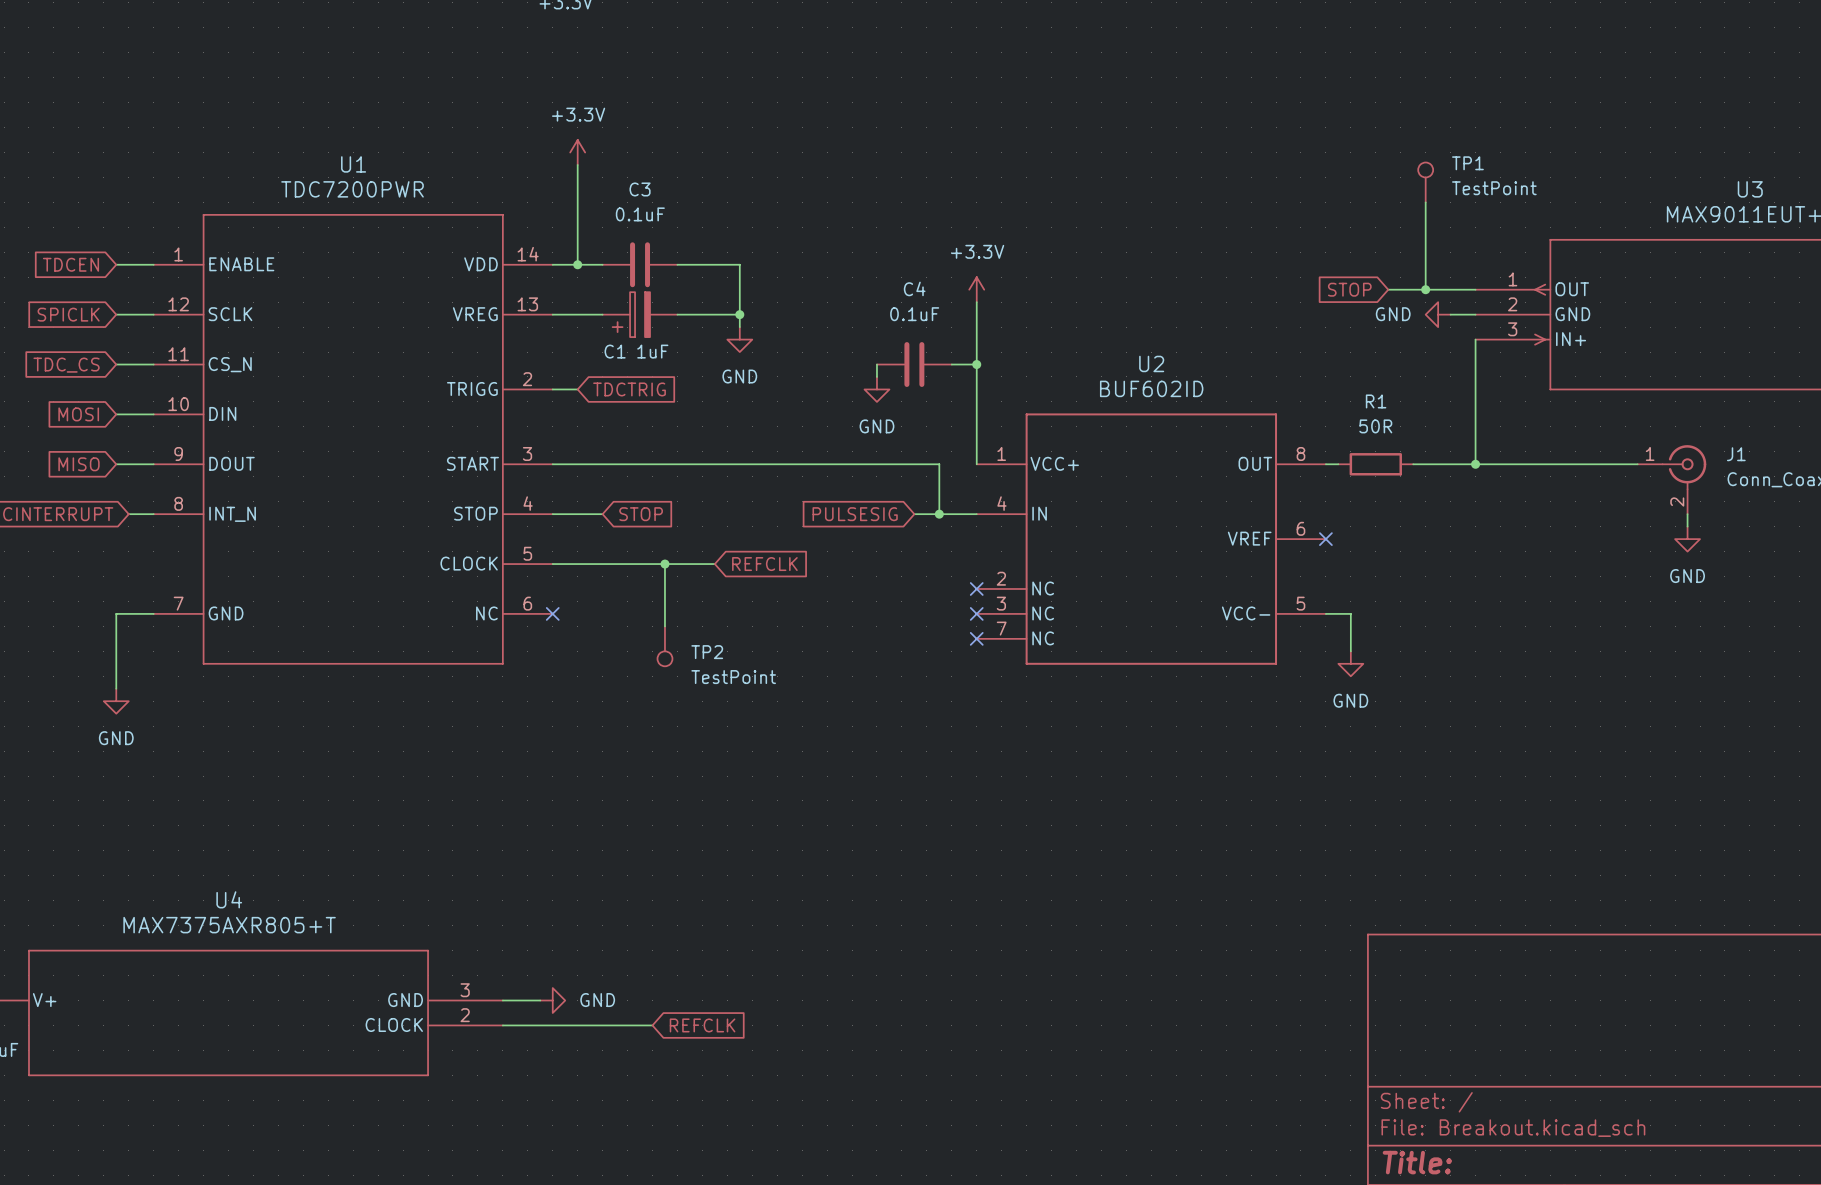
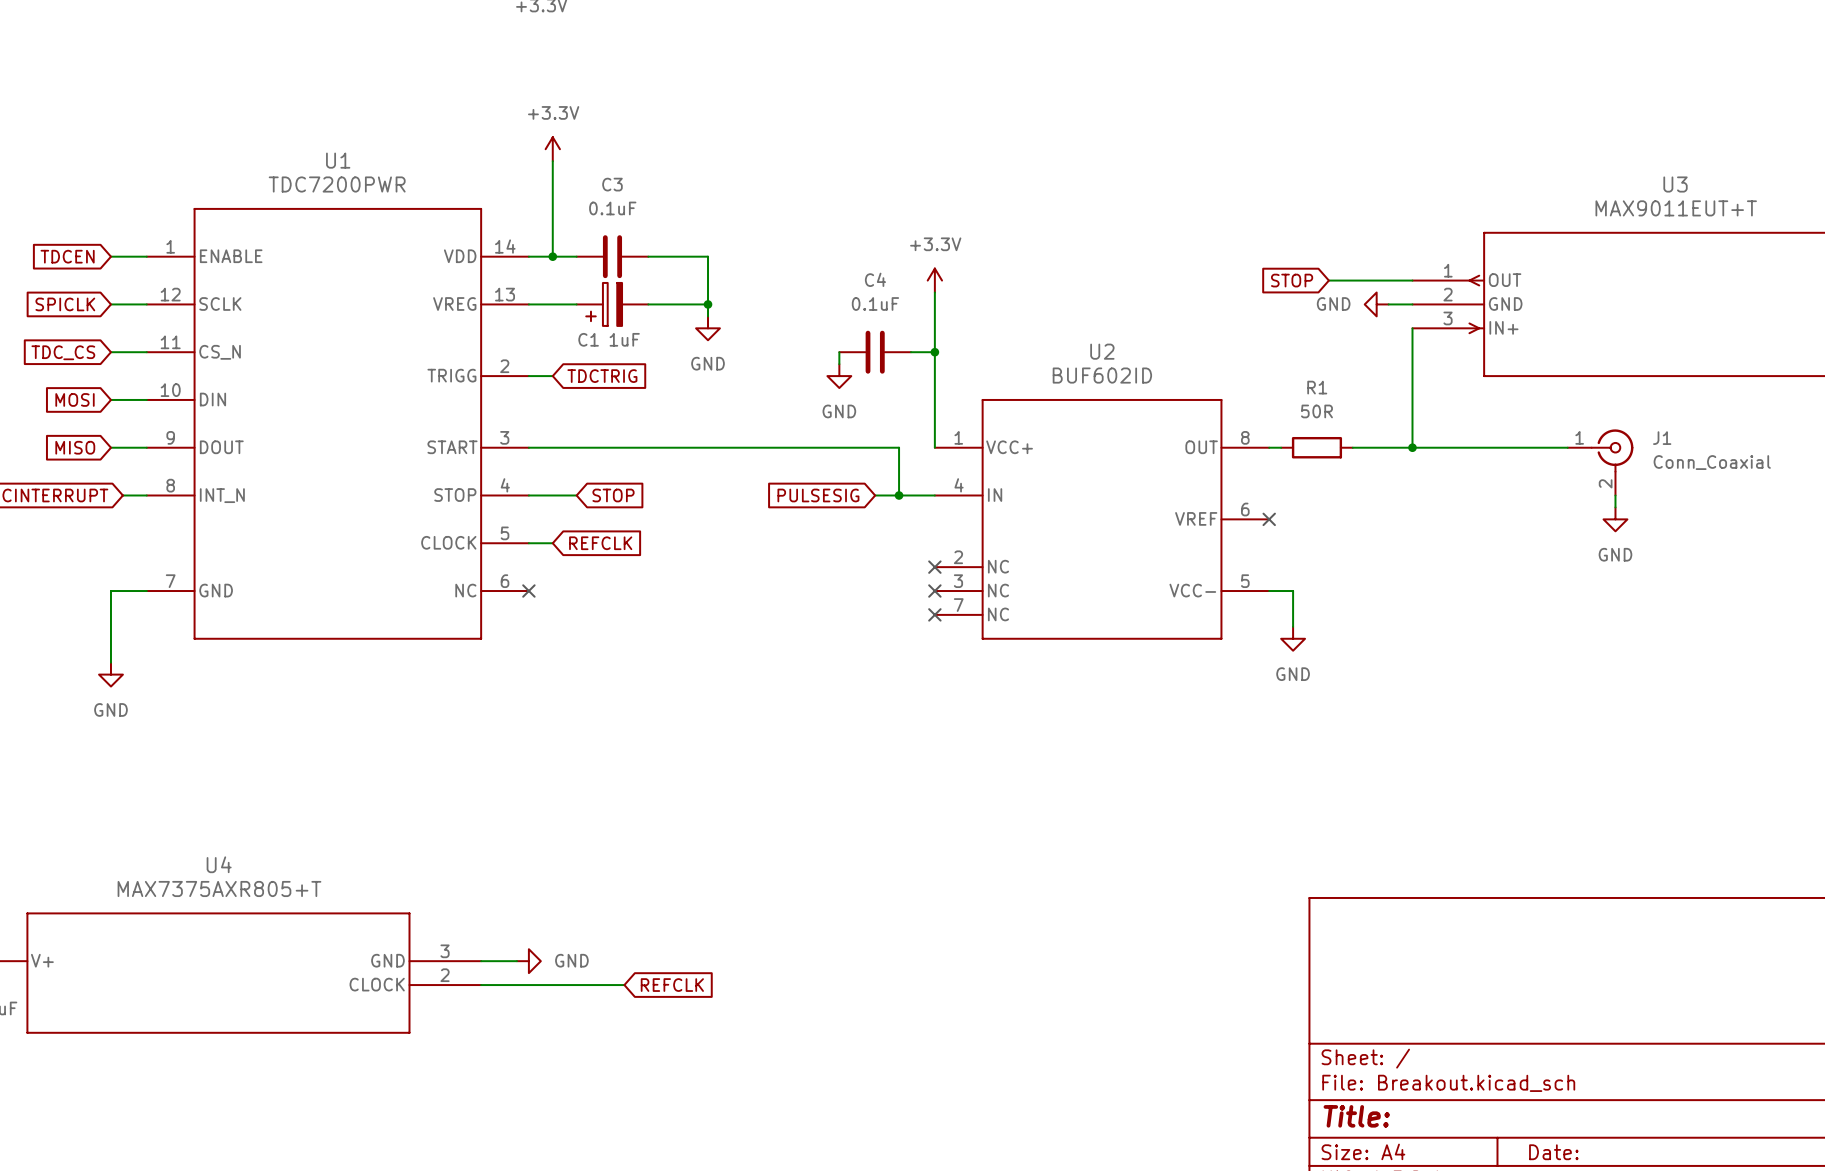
TP1: TestPoint (1425, 182) -> none
wire: (1425, 202) (1425, 289) -> none
junction: (1425, 289) -> none
wire: (577, 564) (714, 564) -> none
wire: (664, 564) (664, 626) -> none
junction: (664, 564) -> none
global label position: REFCLK (764, 564) -> REFCLK (600, 543)
TP2: TestPoint (664, 646) -> none

